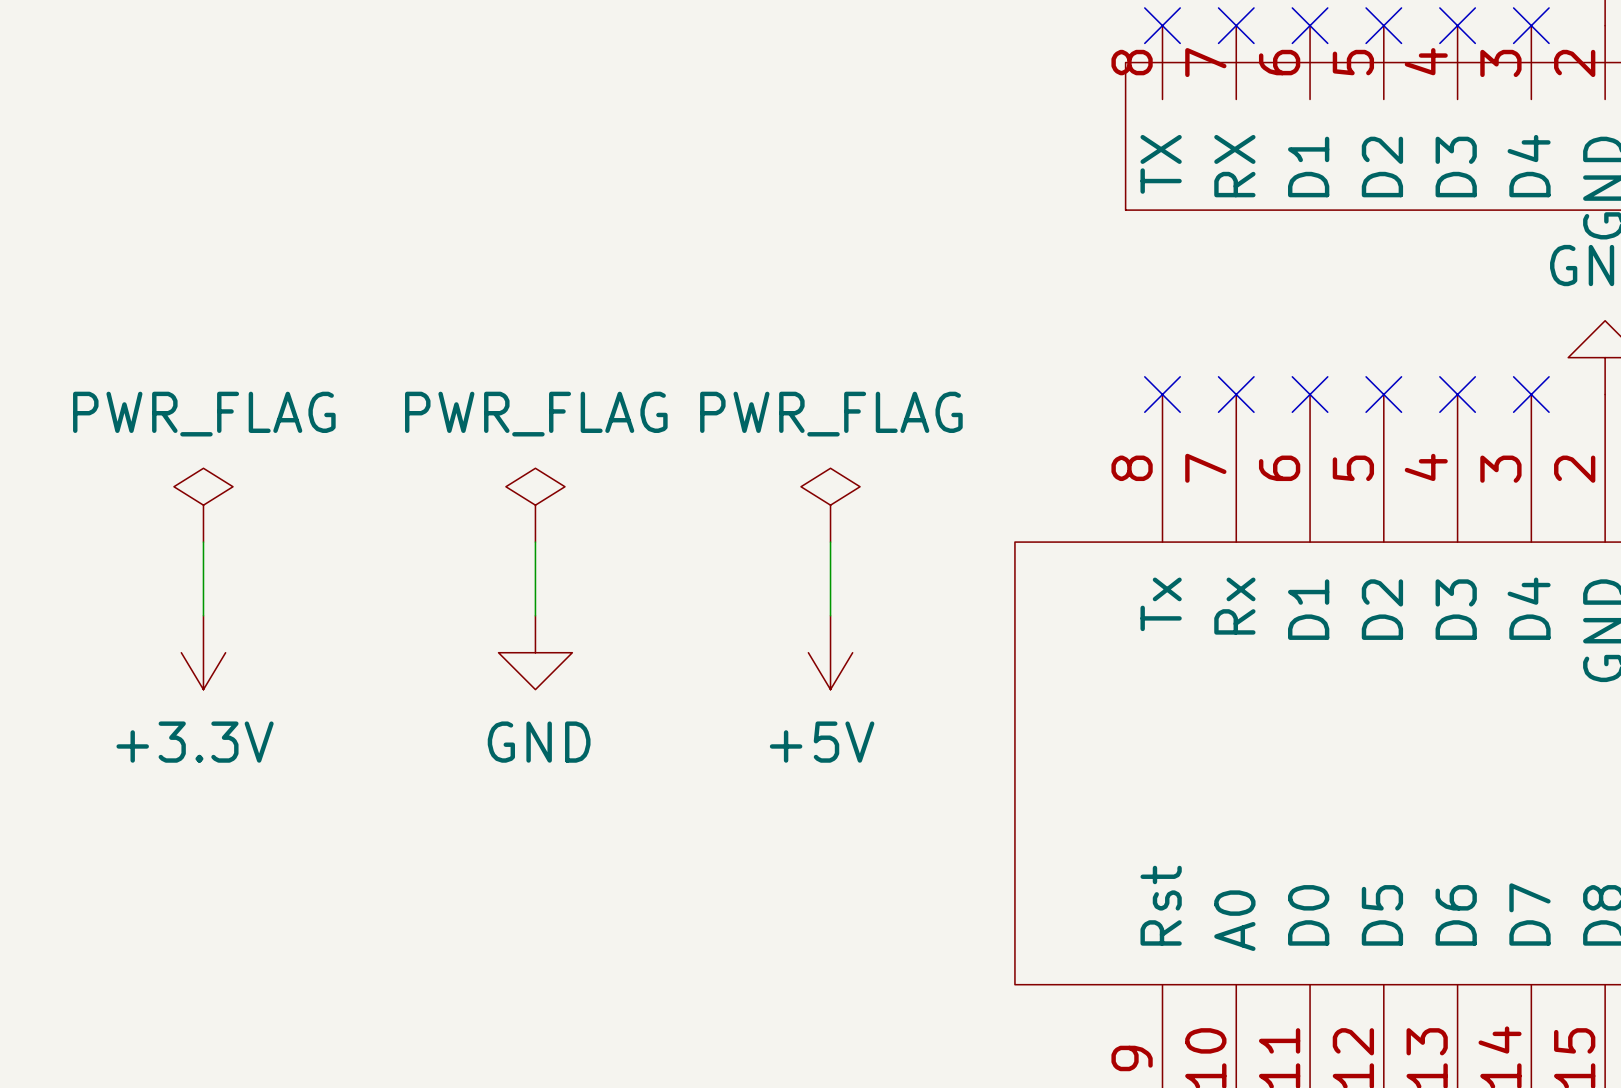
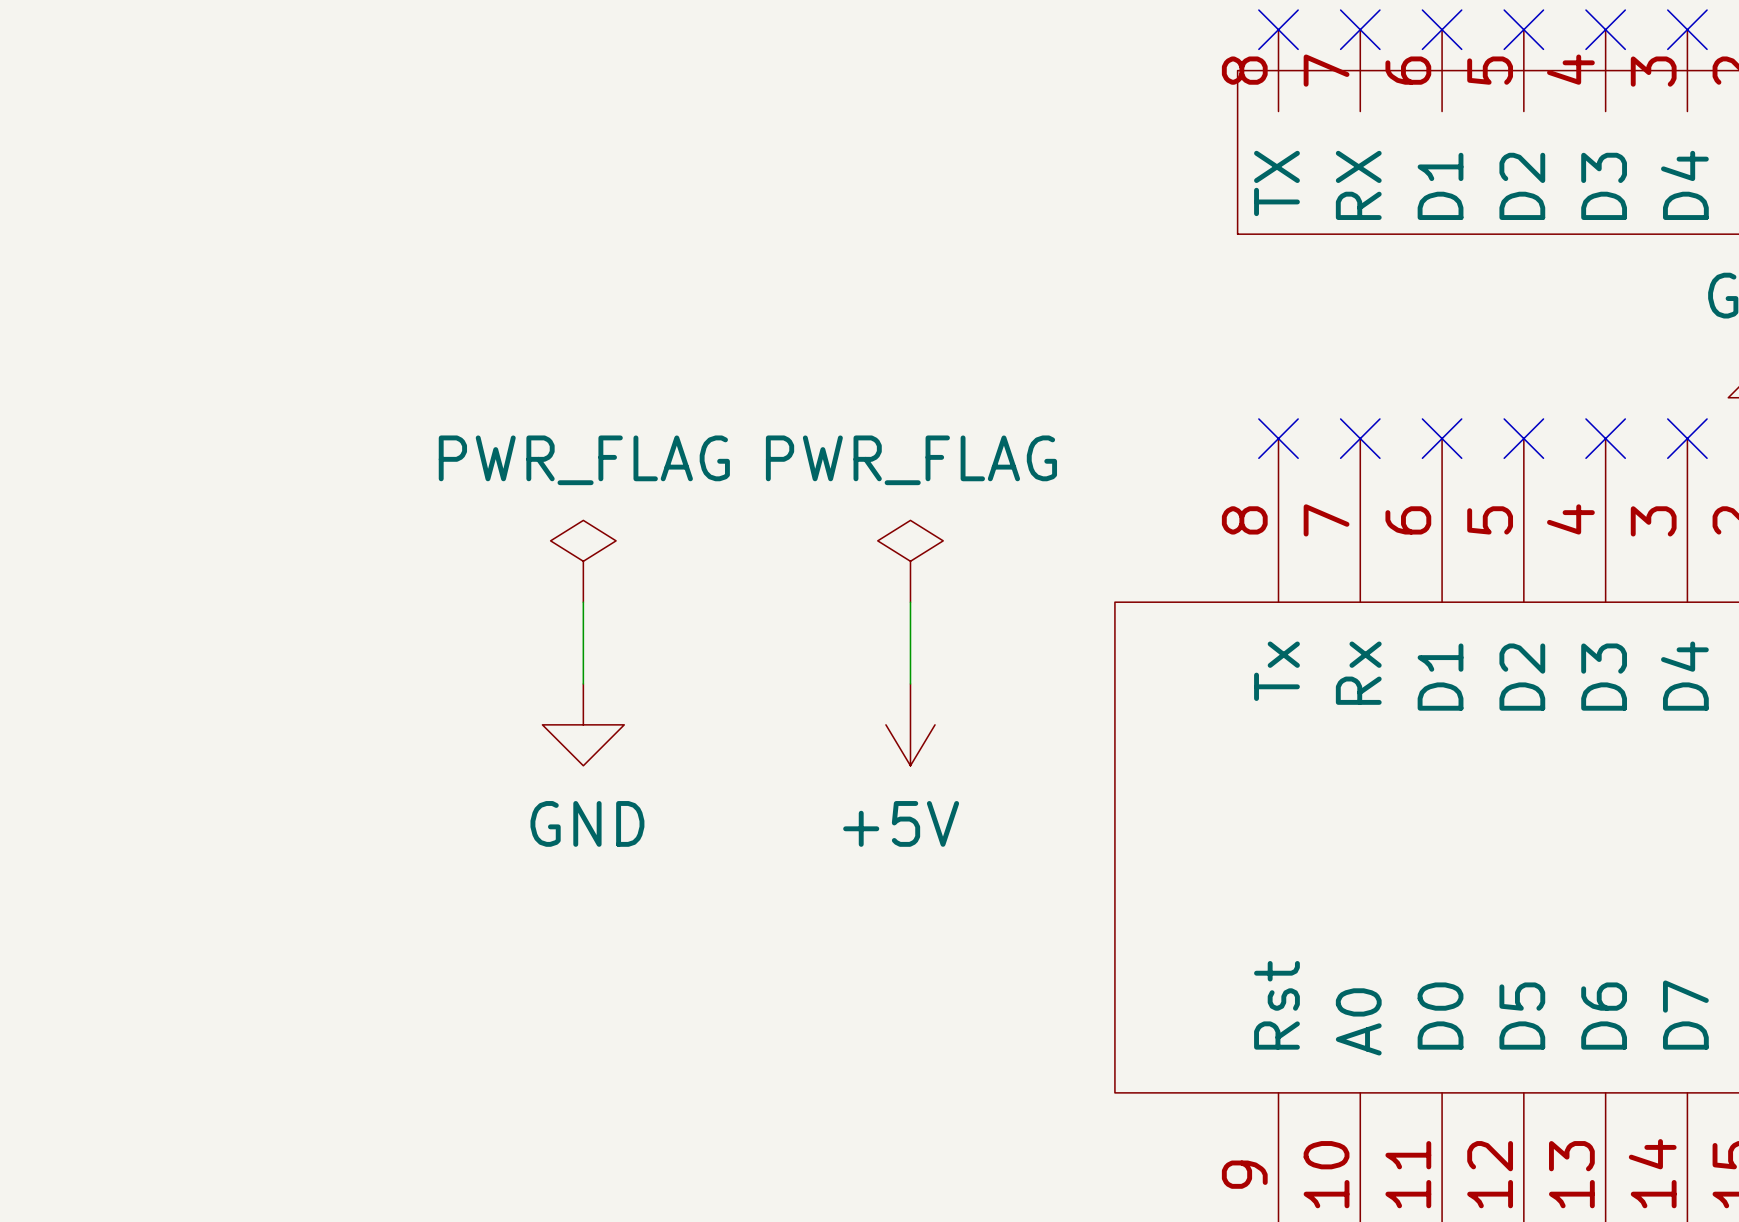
power symbol: PWR_FLAG (203, 505) -> none
wire: (203, 542) (203, 615) -> none
power symbol: +3.3V (203, 652) -> none

